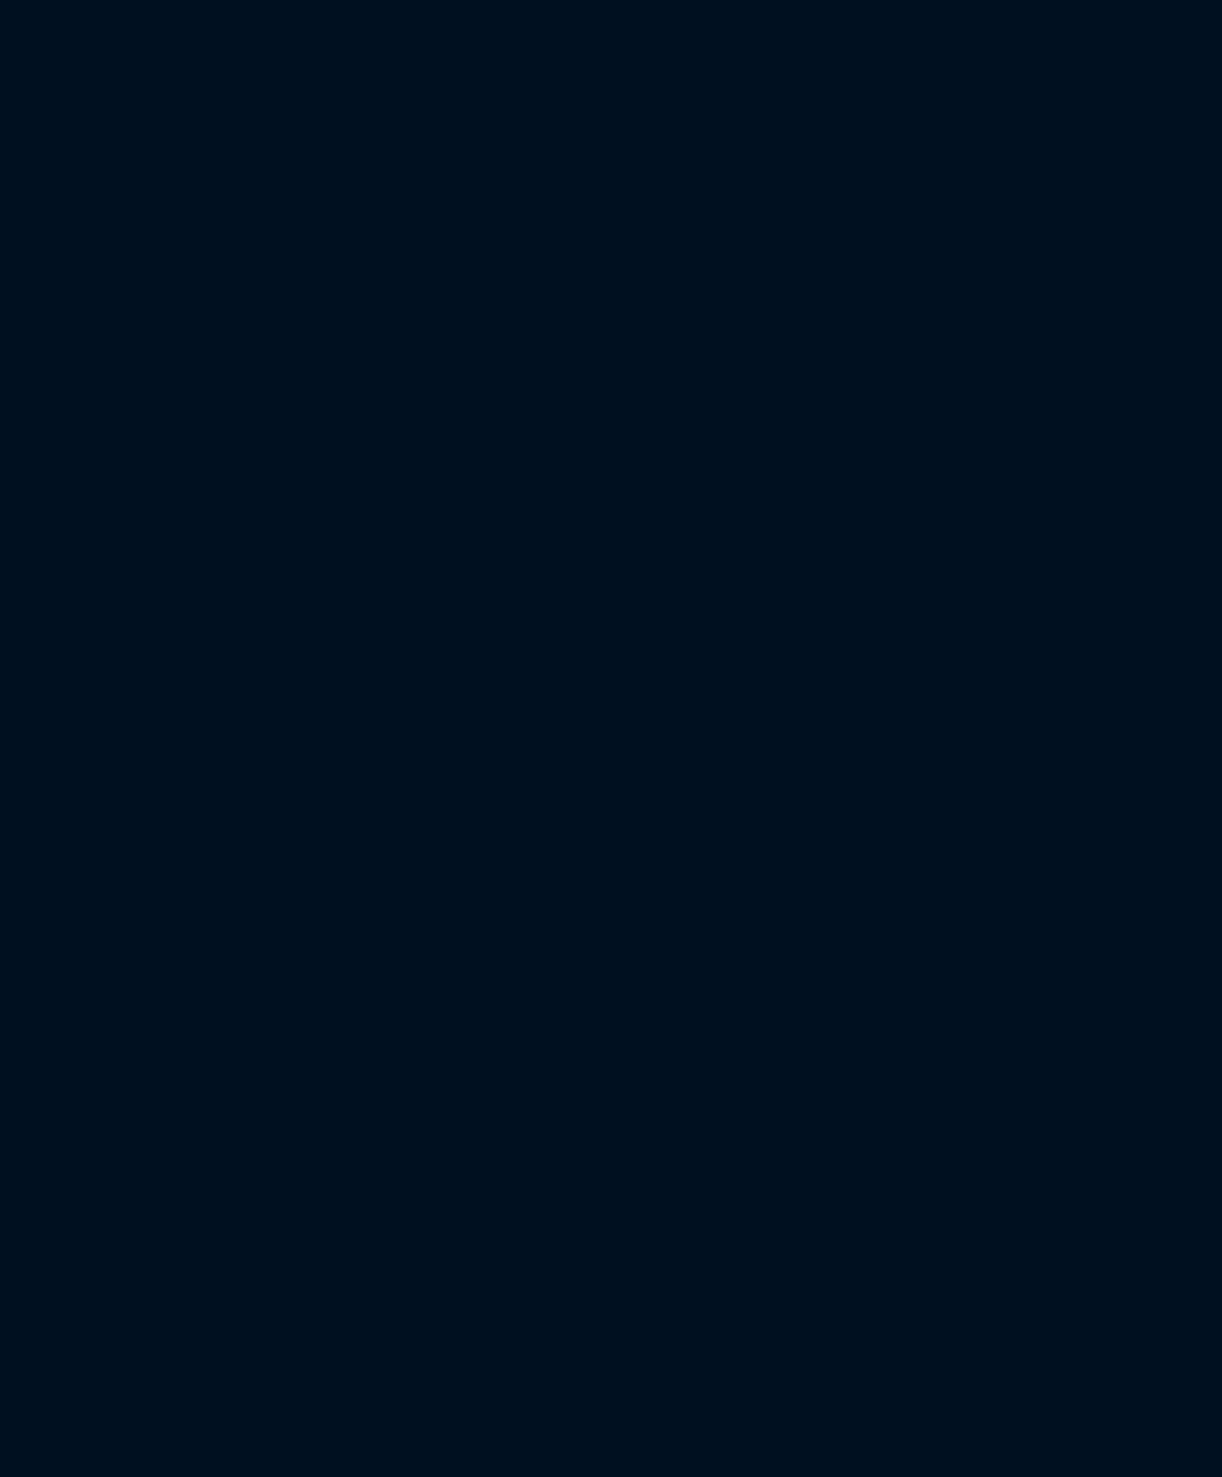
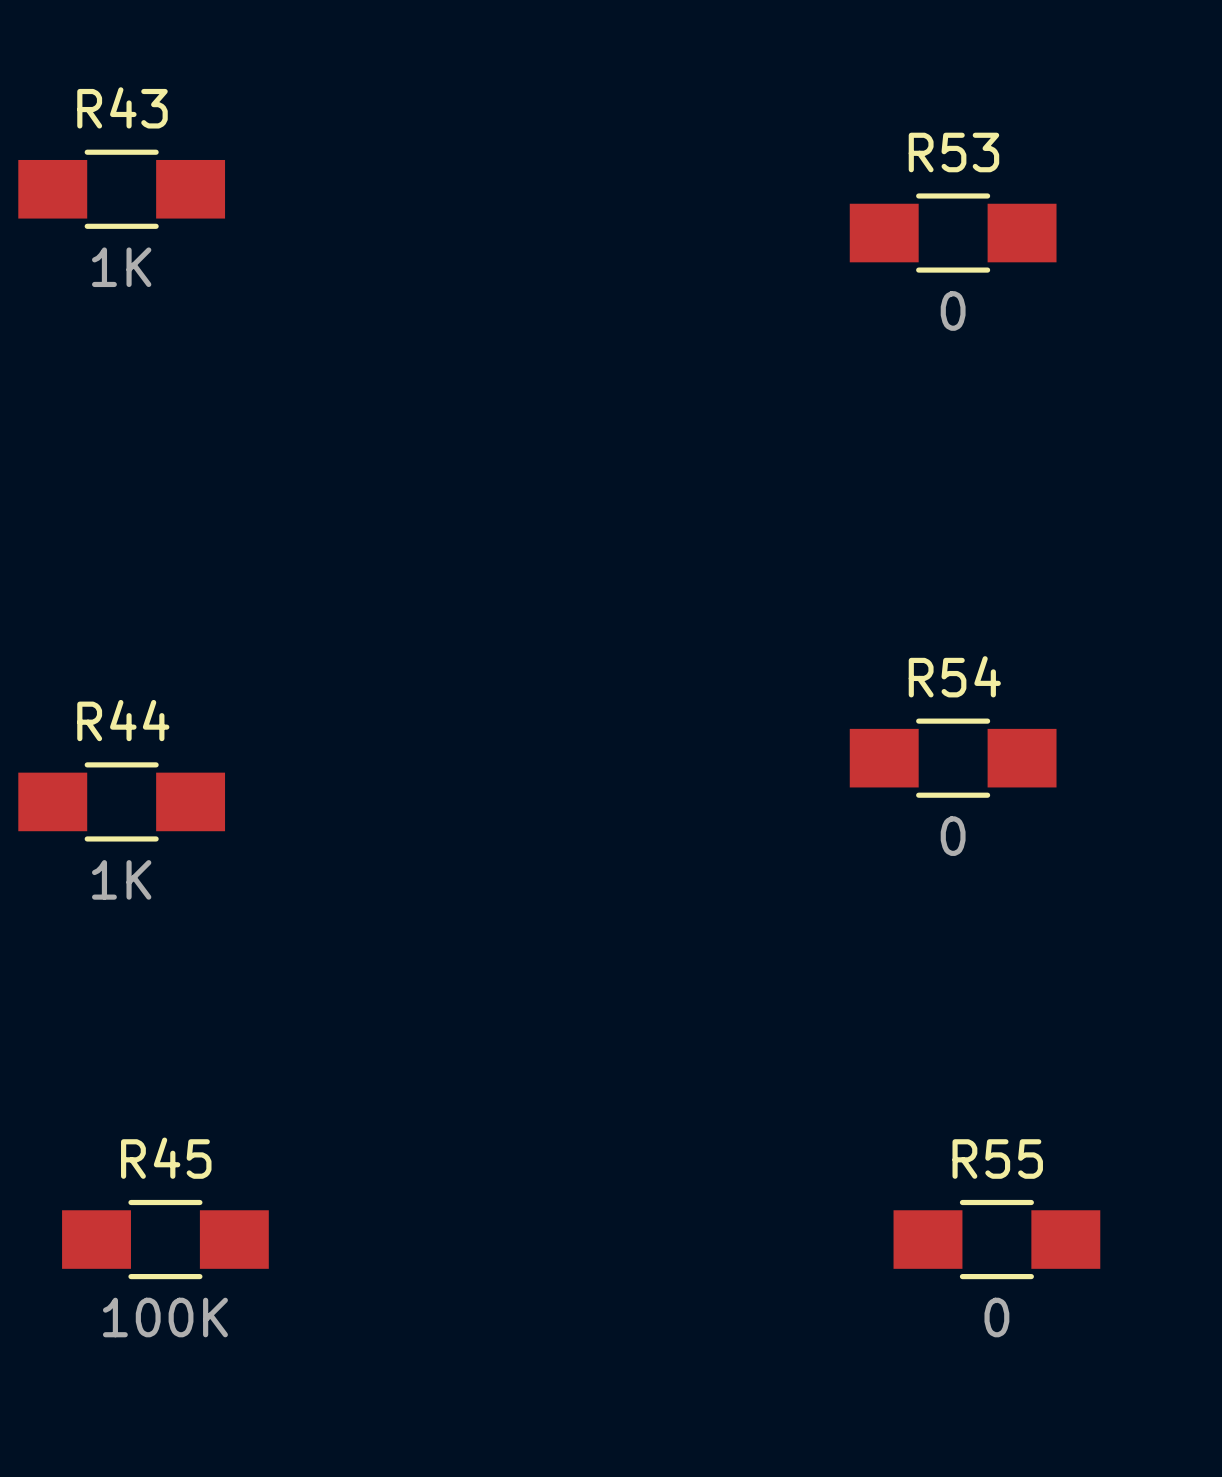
R43: none -> 1K (121, 189)
R53: none -> 0 (953, 233)
R54: none -> 0 (953, 758)
R44: none -> 1K (121, 801)
R45: none -> 100K (165, 1239)
R55: none -> 0 (996, 1239)

